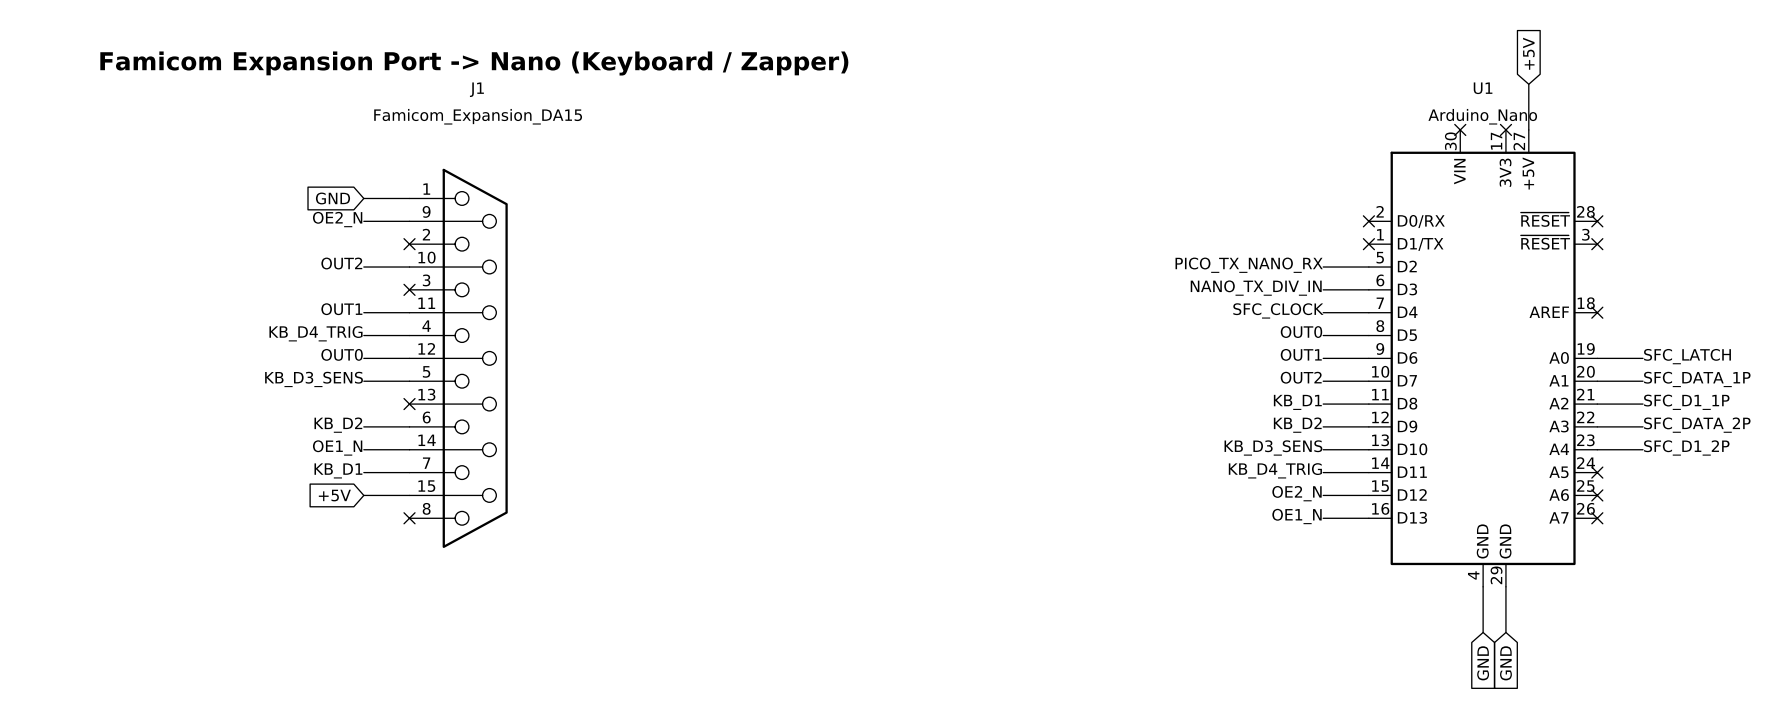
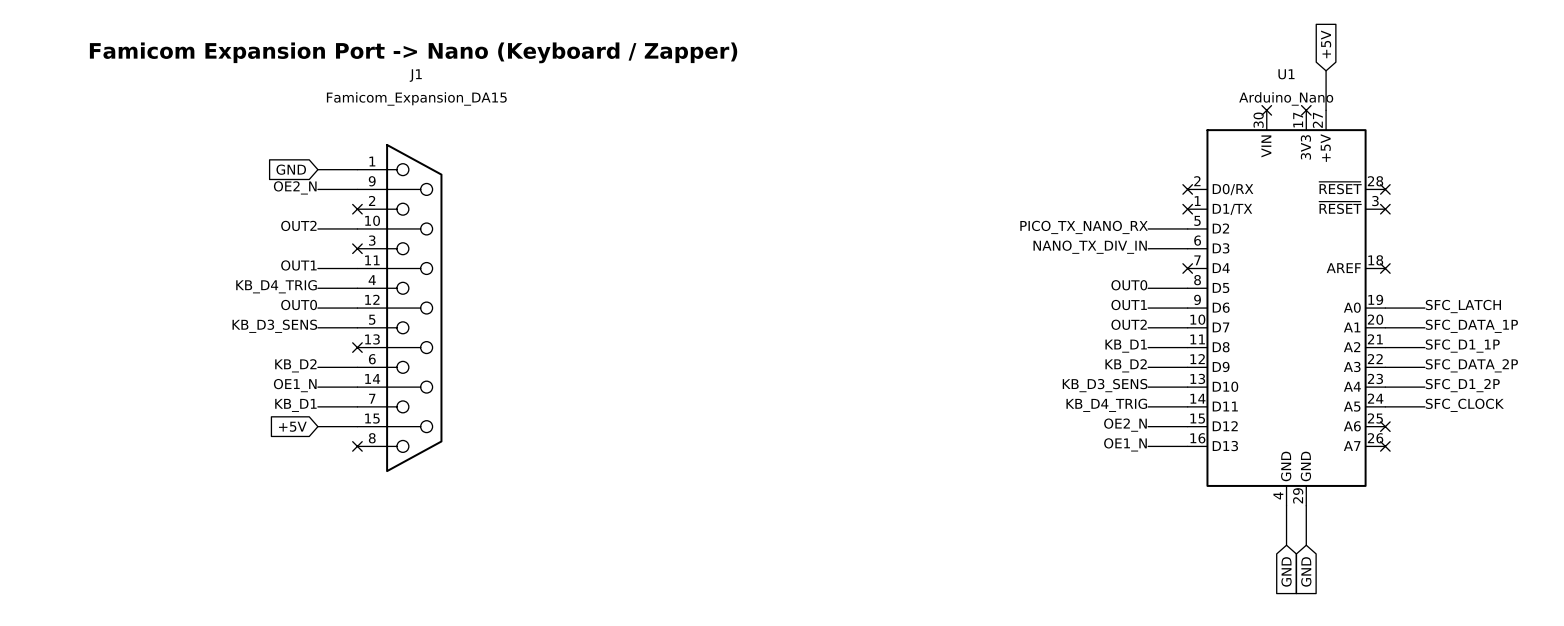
label: SFC_CLOCK (1278, 310) -> none
wire: (1323, 312) (1368, 312) -> none
no-connect mark: none -> (1187, 268)
label: none -> SFC_CLOCK (1464, 405)
wire: none -> (1385, 406) (1424, 406)
no-connect mark: (1597, 472) -> none

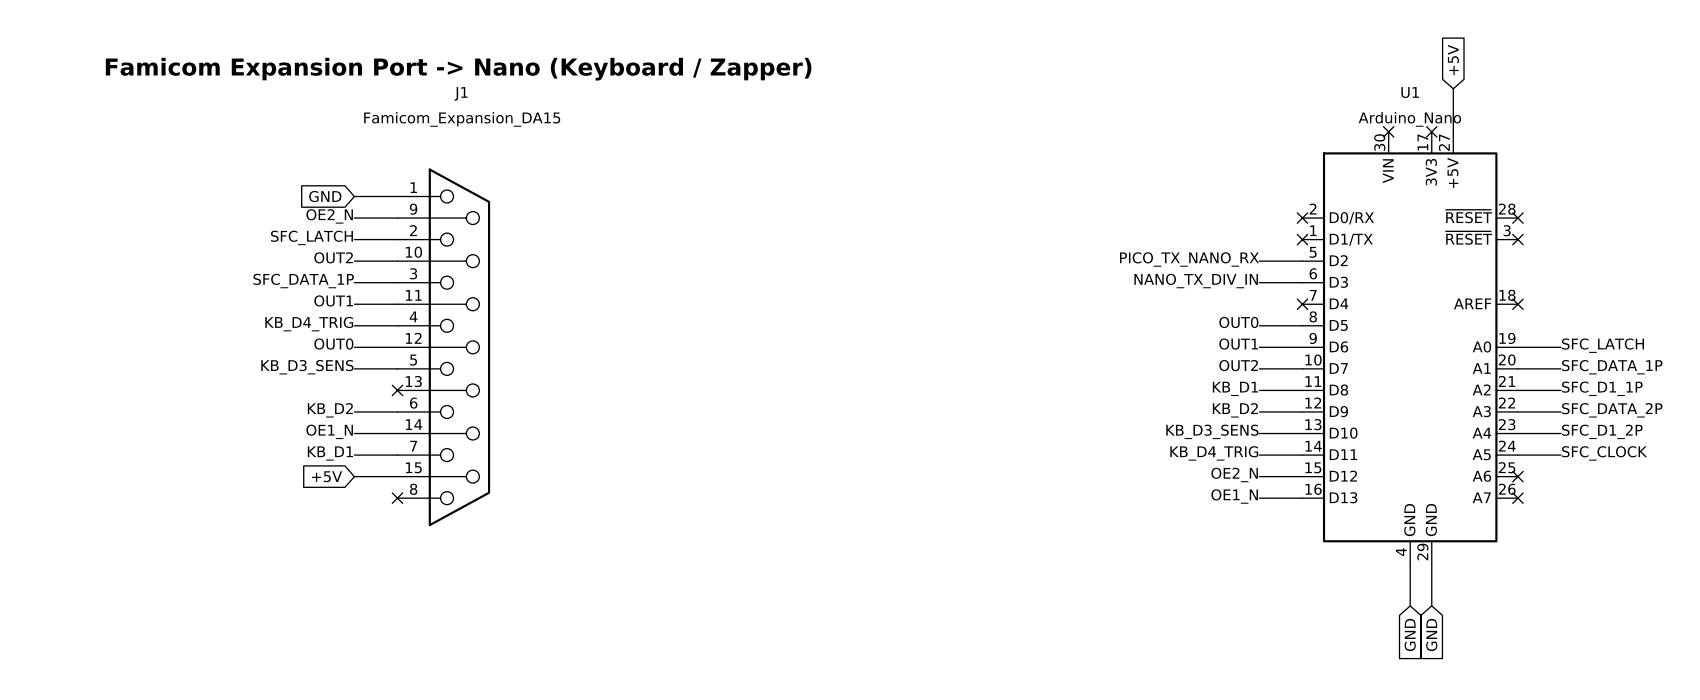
label: none -> SFC_LATCH (311, 237)
wire: none -> (354, 239) (397, 239)
no-connect mark: (357, 209) -> none
label: none -> SFC_DATA_1P (303, 281)
wire: none -> (354, 282) (397, 282)
no-connect mark: (357, 248) -> none

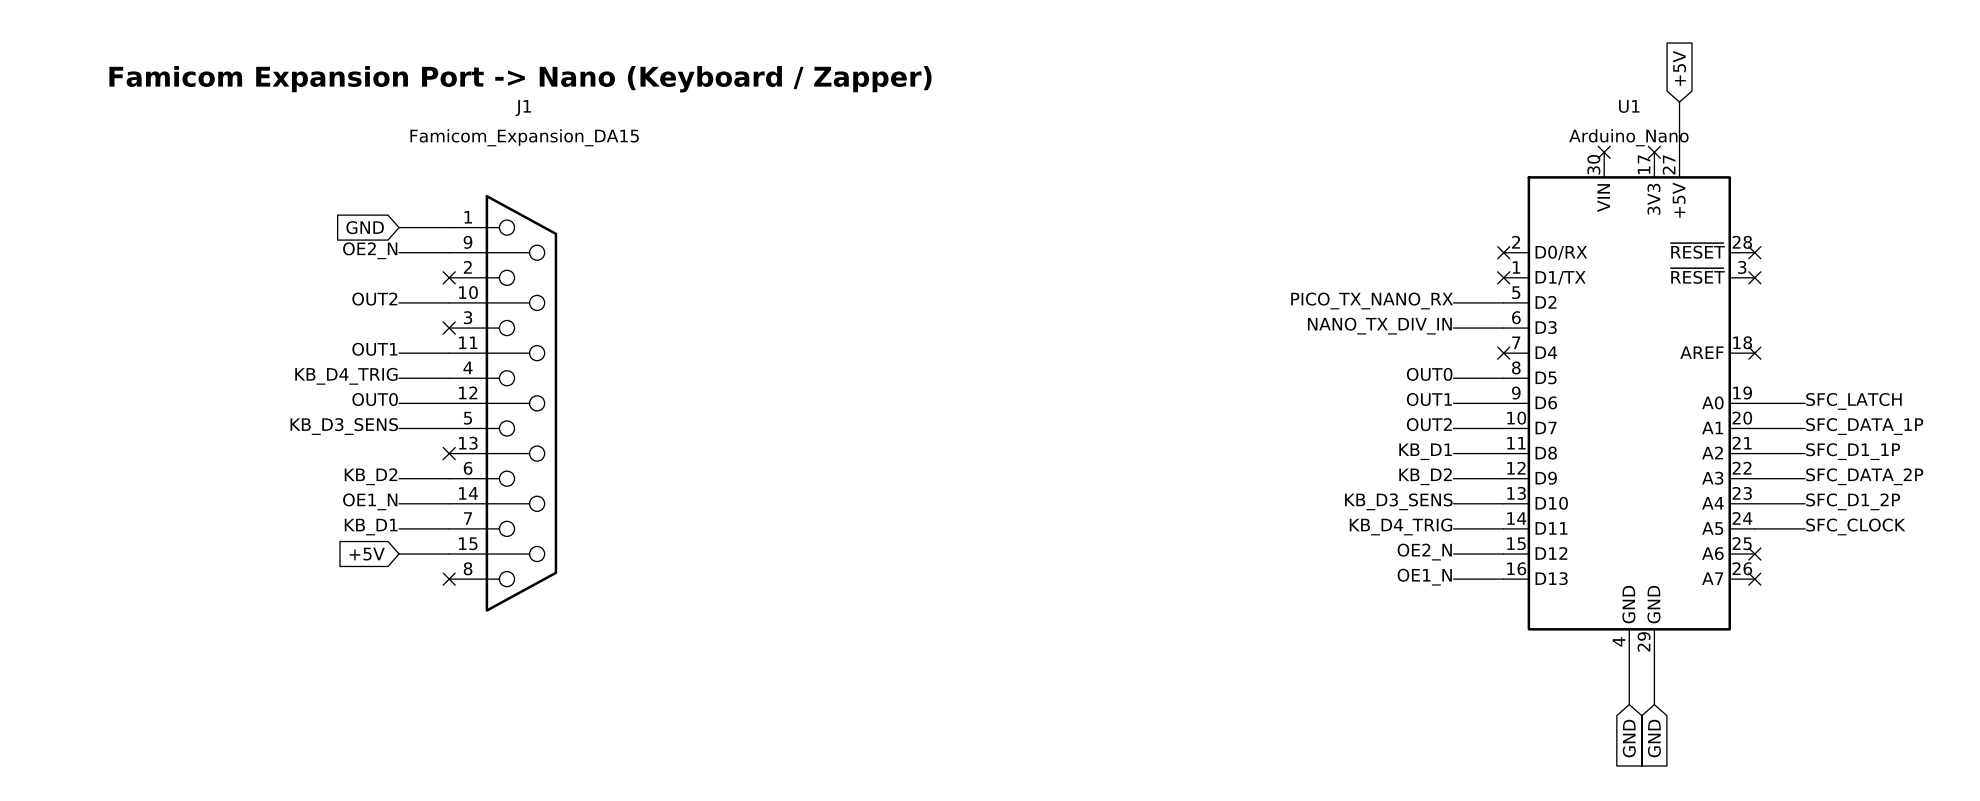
label: SFC_LATCH (311, 237) -> none
wire: (354, 239) (397, 239) -> none
no-connect mark: none -> (449, 277)
label: SFC_DATA_1P (303, 281) -> none
wire: (354, 282) (397, 282) -> none
no-connect mark: none -> (449, 328)

